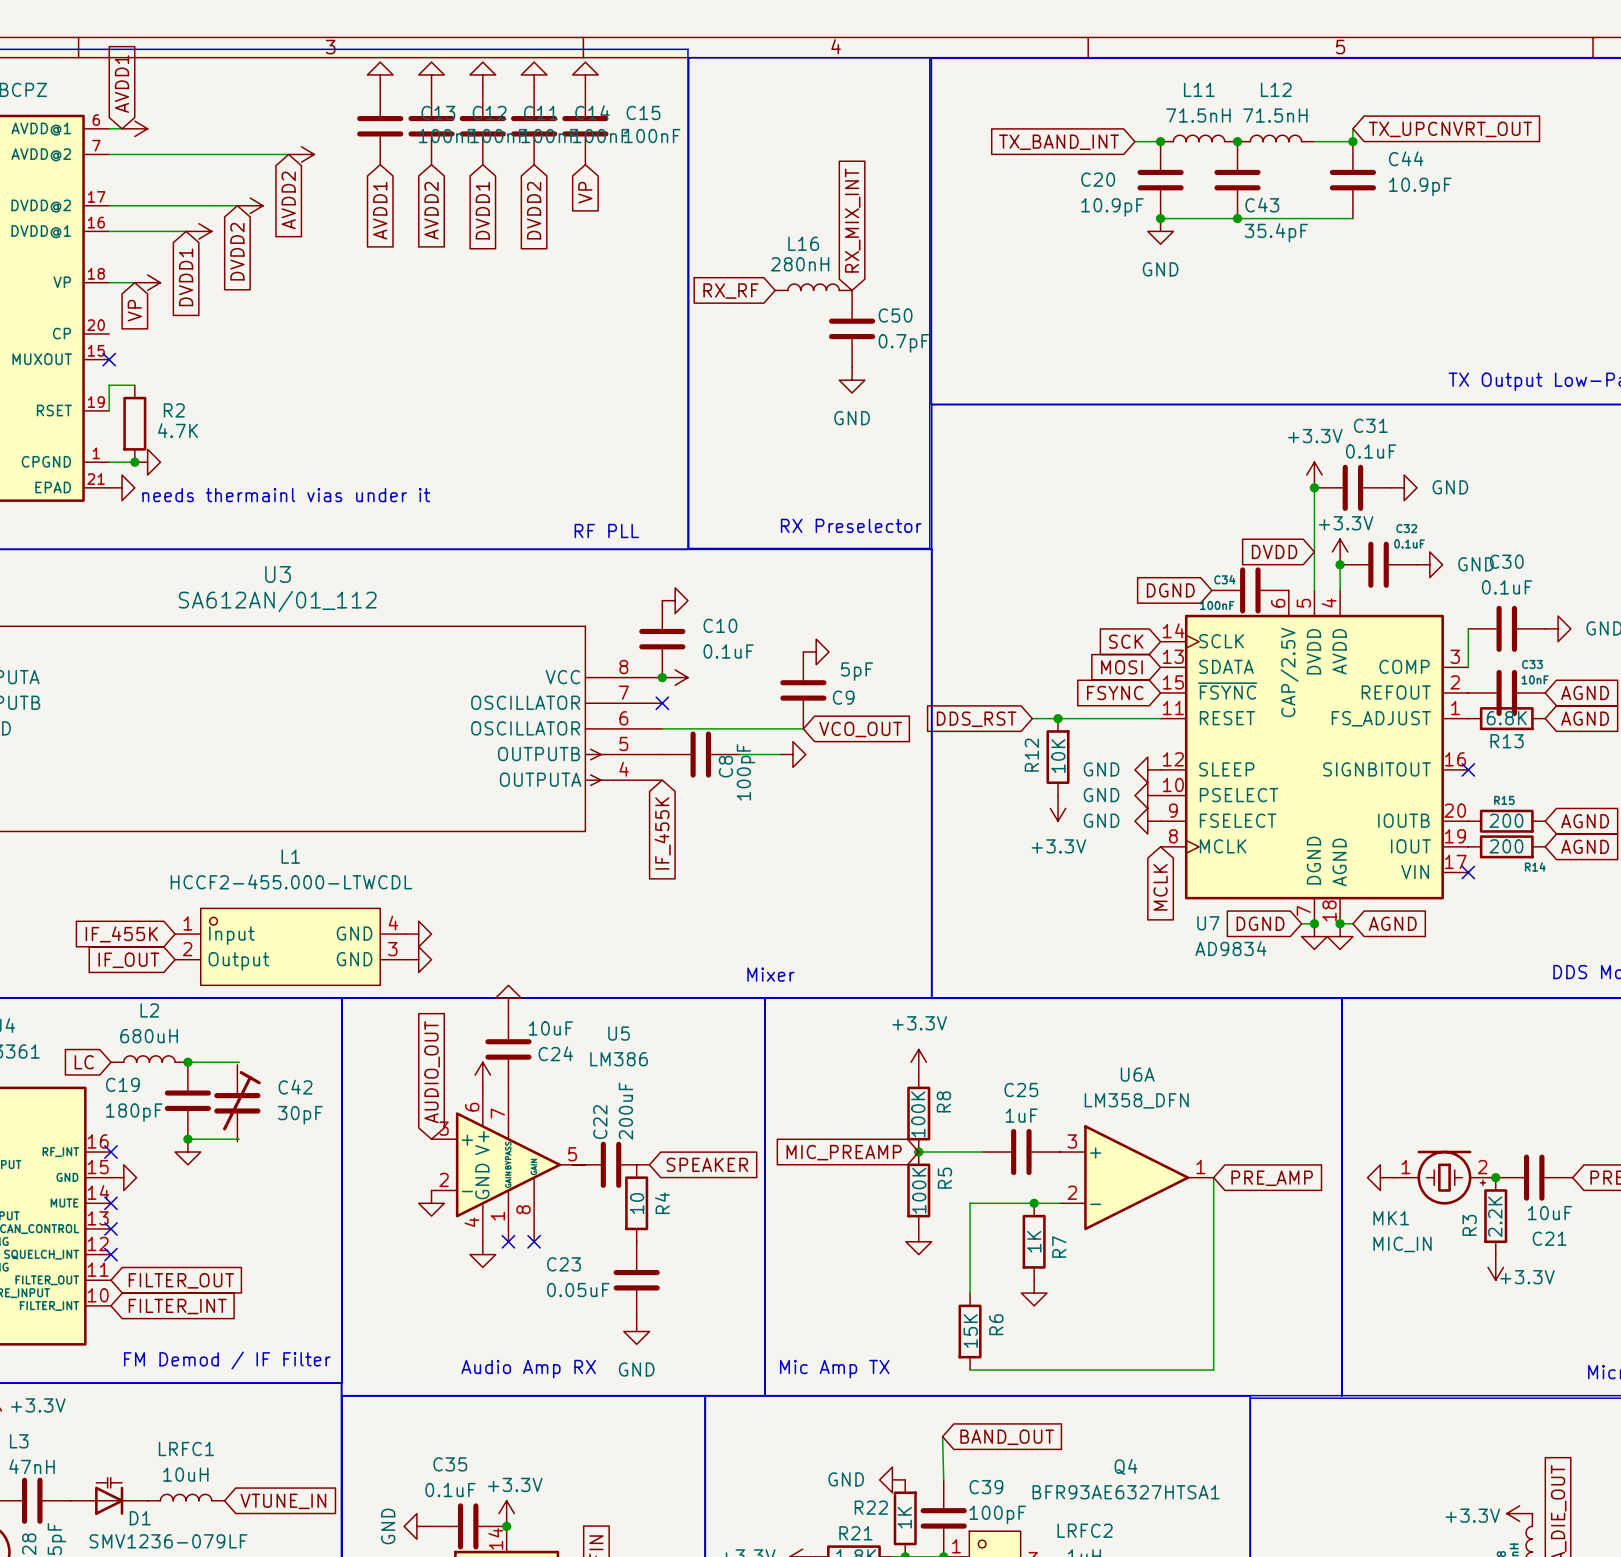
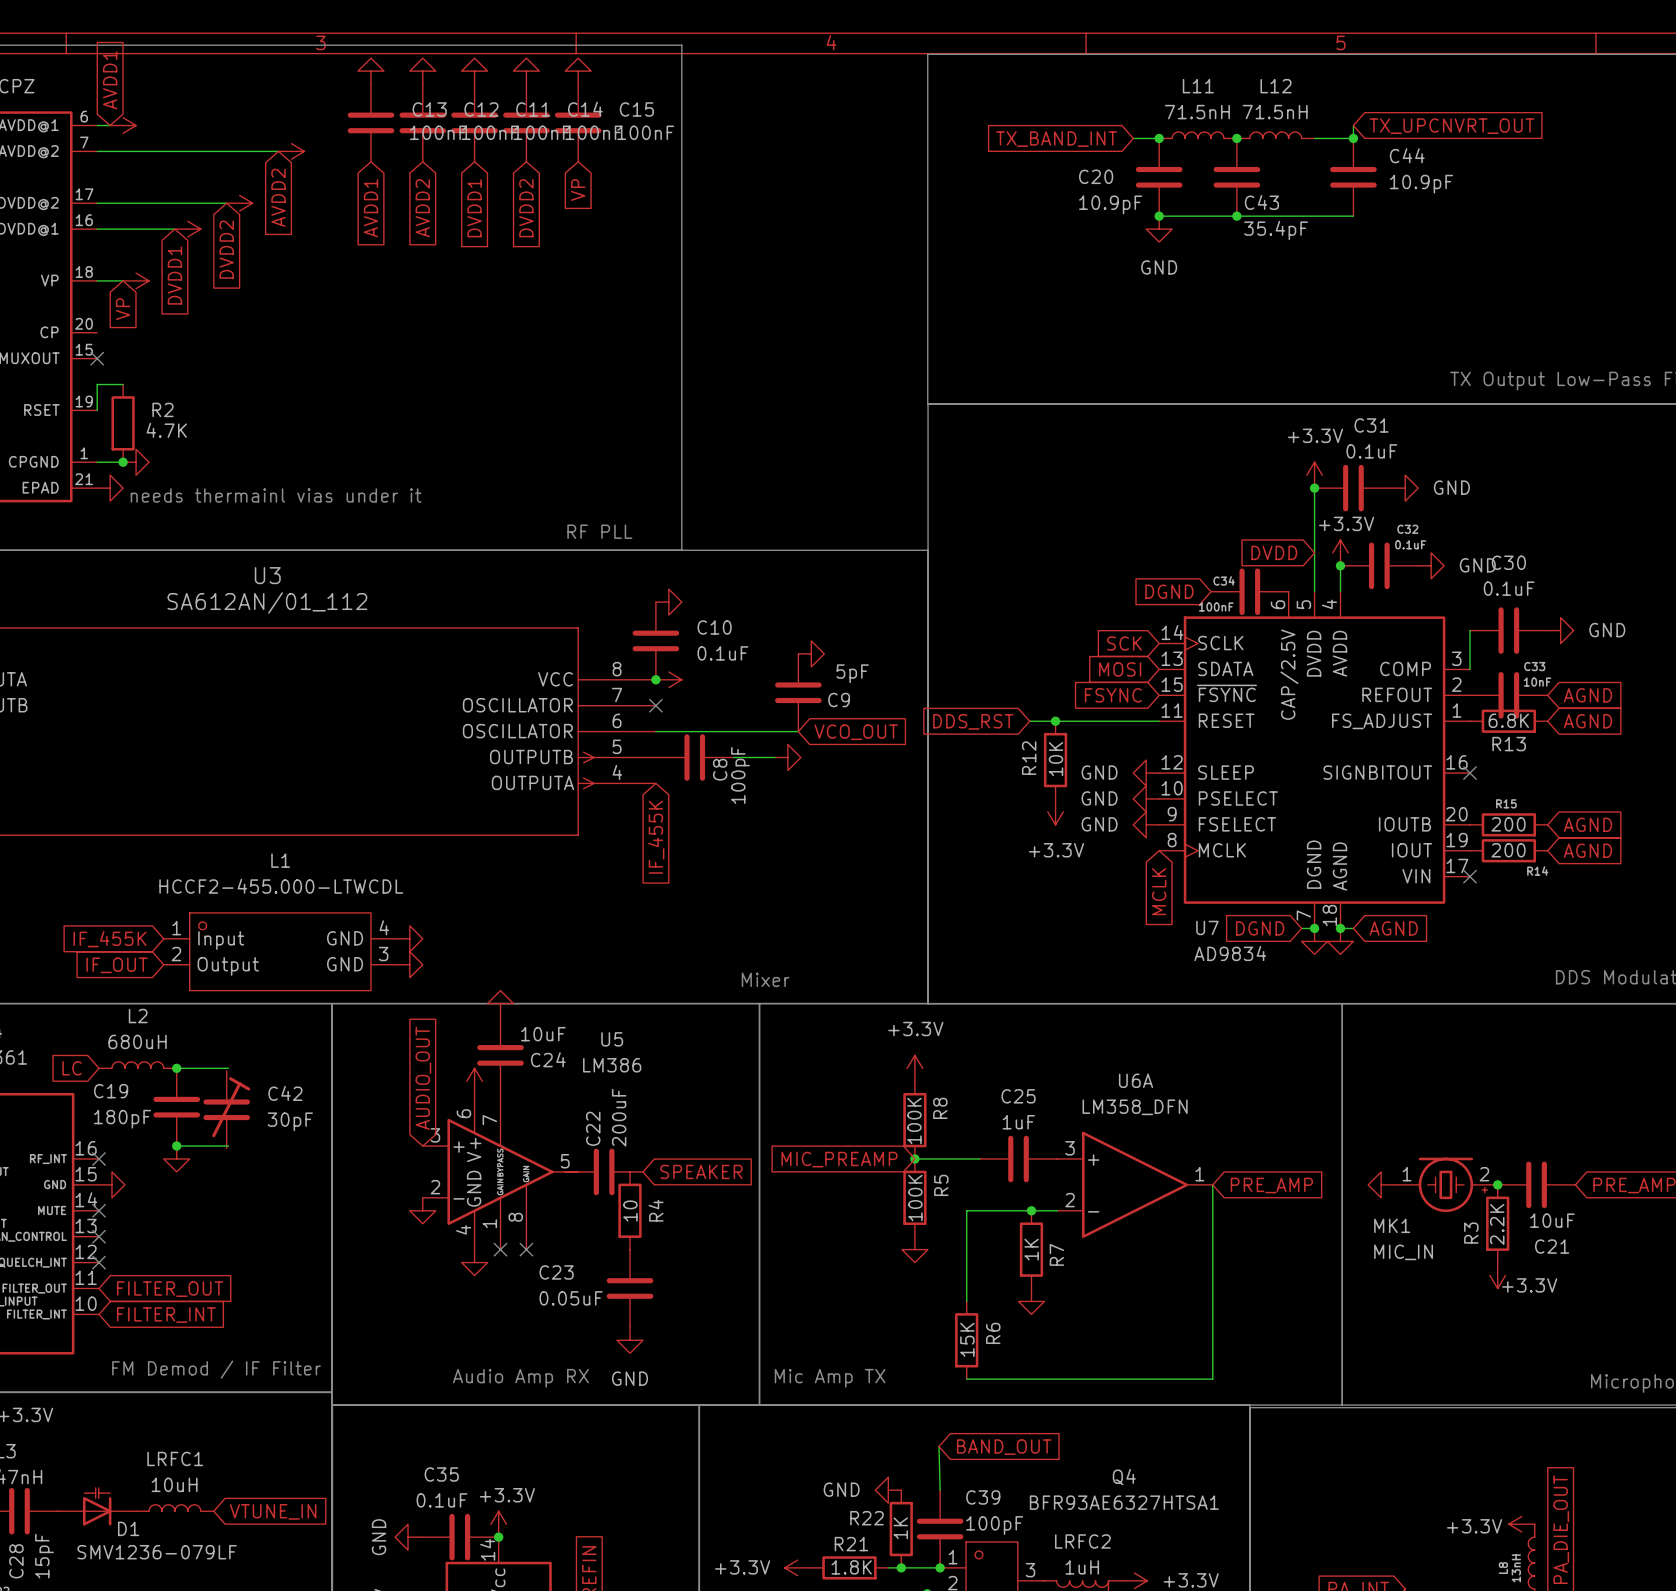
line: (688, 57) (929, 57) (929, 548) (688, 548) (688, 57) -> none
global label: RX_MIX_INT (852, 220) -> none
L16: 280nH (813, 287) -> none
global label: RX_RF (731, 291) -> none
C50: 0.7pF (852, 328) -> none
power symbol: GND (852, 380) -> none
text: RX Preselector (851, 525) -> none

